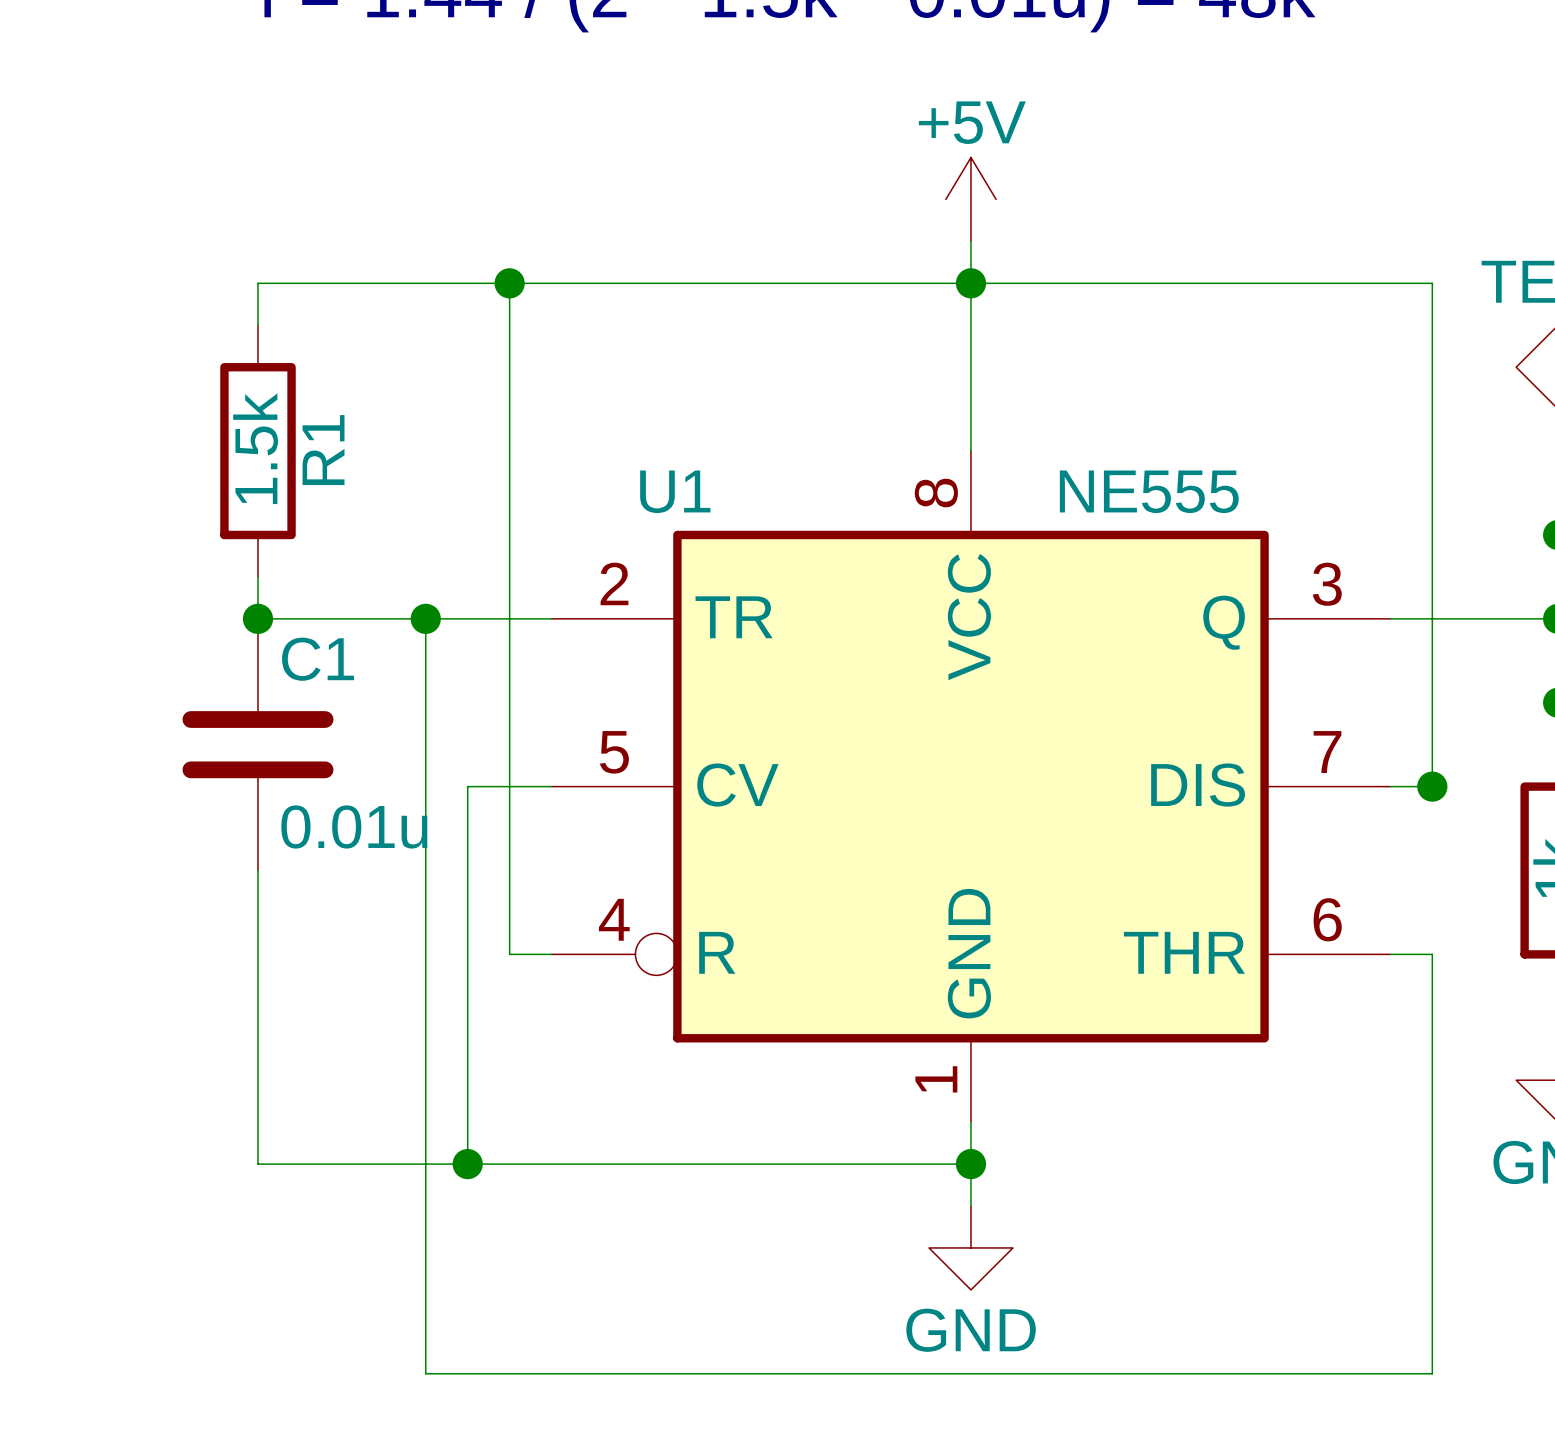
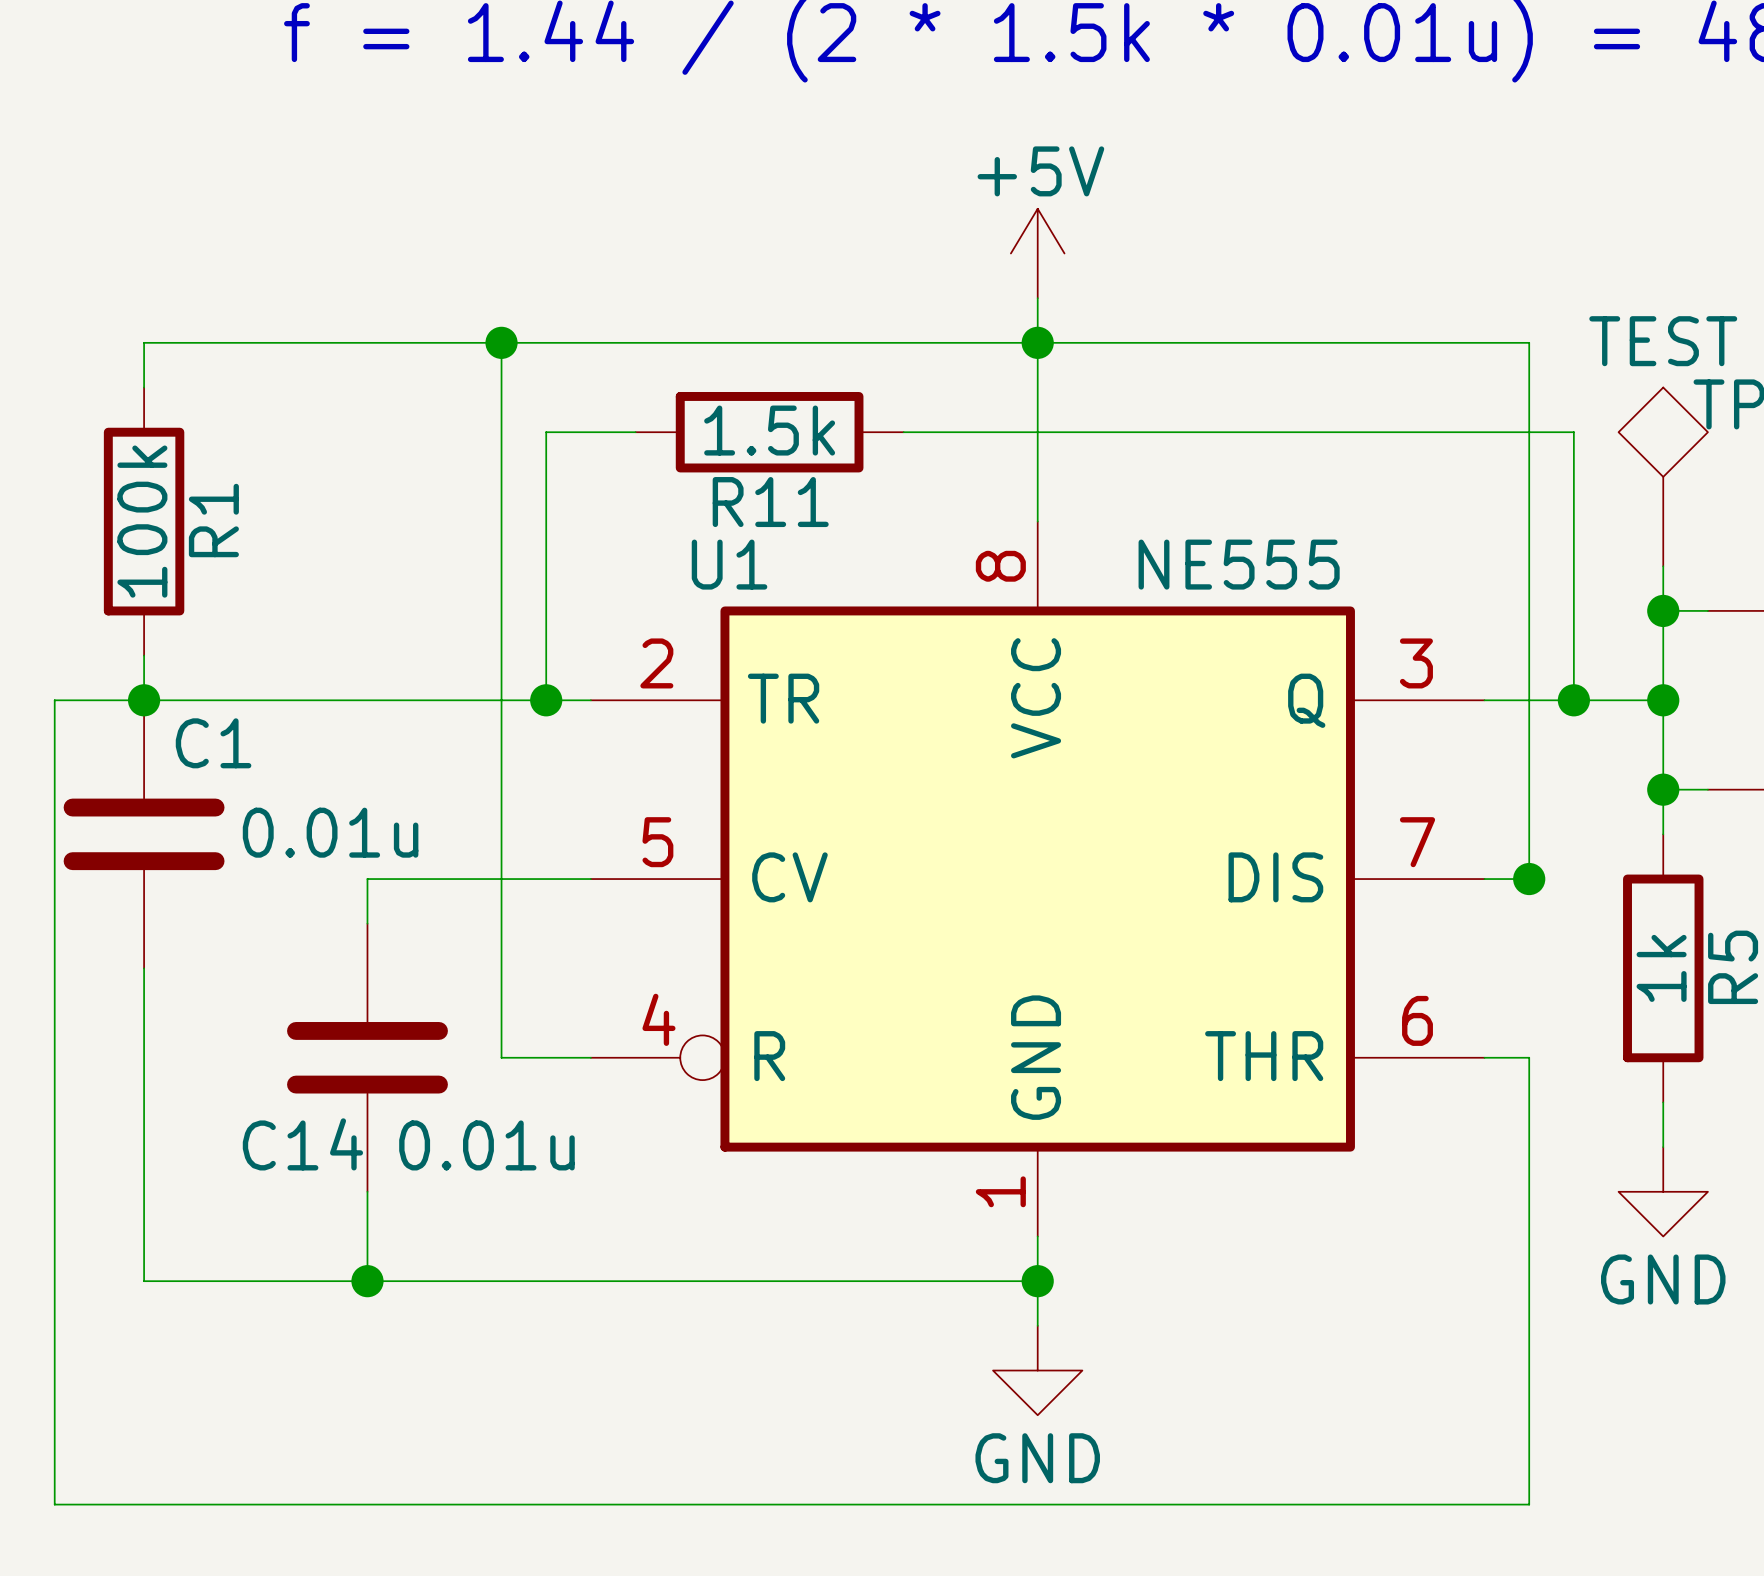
wire: (257, 283) (257, 325) -> (278, 342) (144, 342) (144, 387)
wire: none -> (501, 342) (501, 879) (367, 879) (367, 923)
wire: (509, 283) (509, 367) -> (635, 432) (546, 432)
junction position: (509, 283) -> (501, 342)
R11: none -> 1.5k (769, 432)
wire: none -> (903, 432) (1573, 432) (1573, 700)
R1 value: 1.5k (255, 448) -> 100k (142, 521)
R1 position: (257, 451) -> (144, 521)
wire: (257, 576) (257, 618) -> (144, 655) (144, 700)
junction: none -> (144, 700)
junction: (257, 618) -> none
wire: (425, 618) (425, 1373) -> (278, 700) (54, 700) (54, 1504) (456, 1504)
junction position: (425, 618) -> (546, 700)
wire: (509, 618) (509, 954) -> none
junction: none -> (1573, 700)
C1 position: (257, 744) -> (144, 834)
C1 value position: 0.01u (354, 826) -> 0.01u (330, 832)
wire: (257, 870) (257, 1164) -> (144, 968) (144, 1281) (278, 1281)
C14: none -> 0.01u (367, 1057)
wire: (467, 954) (467, 1164) -> (501, 1057) (546, 1057)
wire: none -> (367, 1191) (367, 1281)
junction position: (467, 1164) -> (367, 1281)

